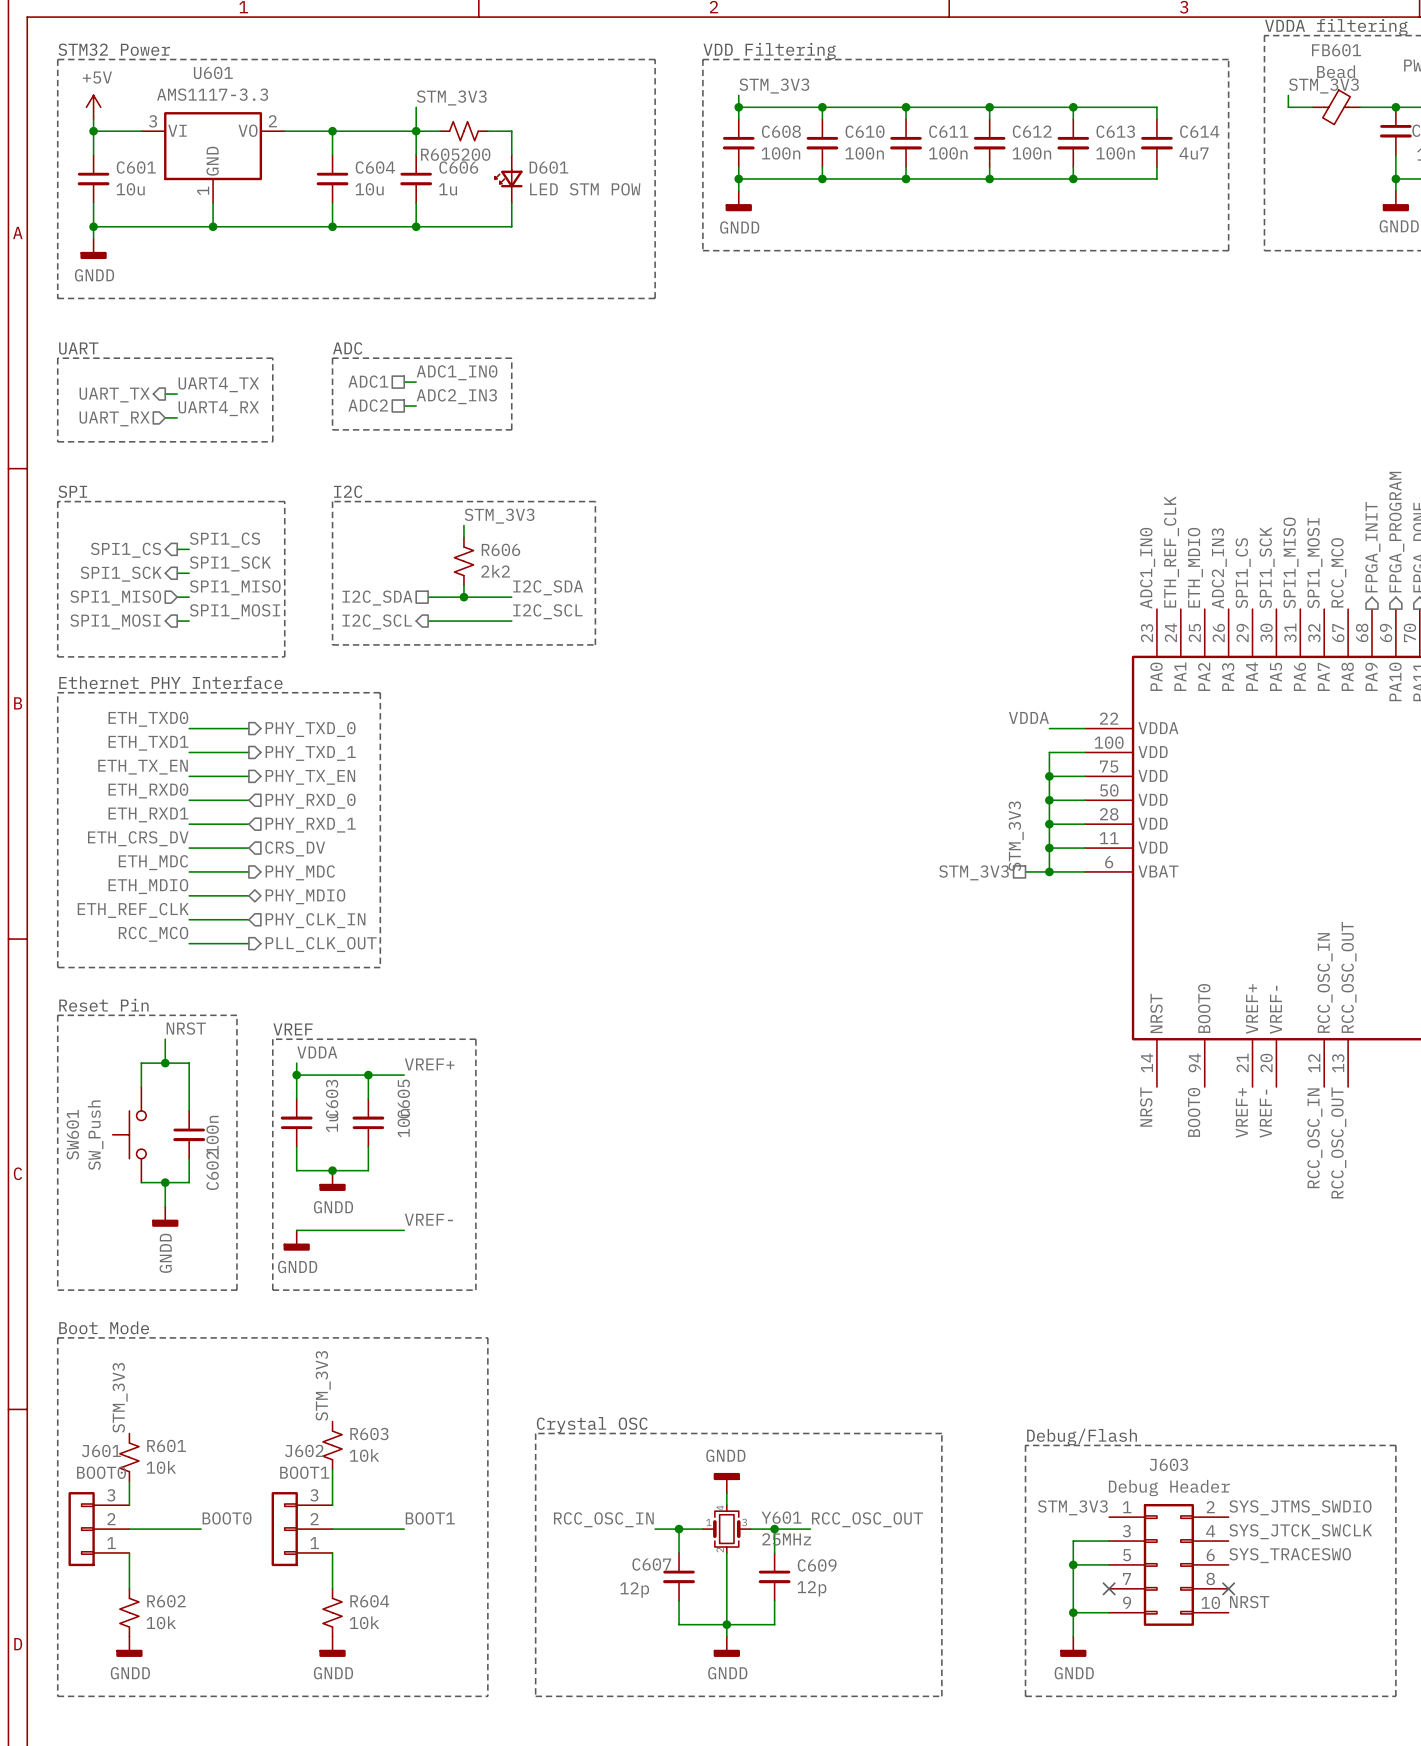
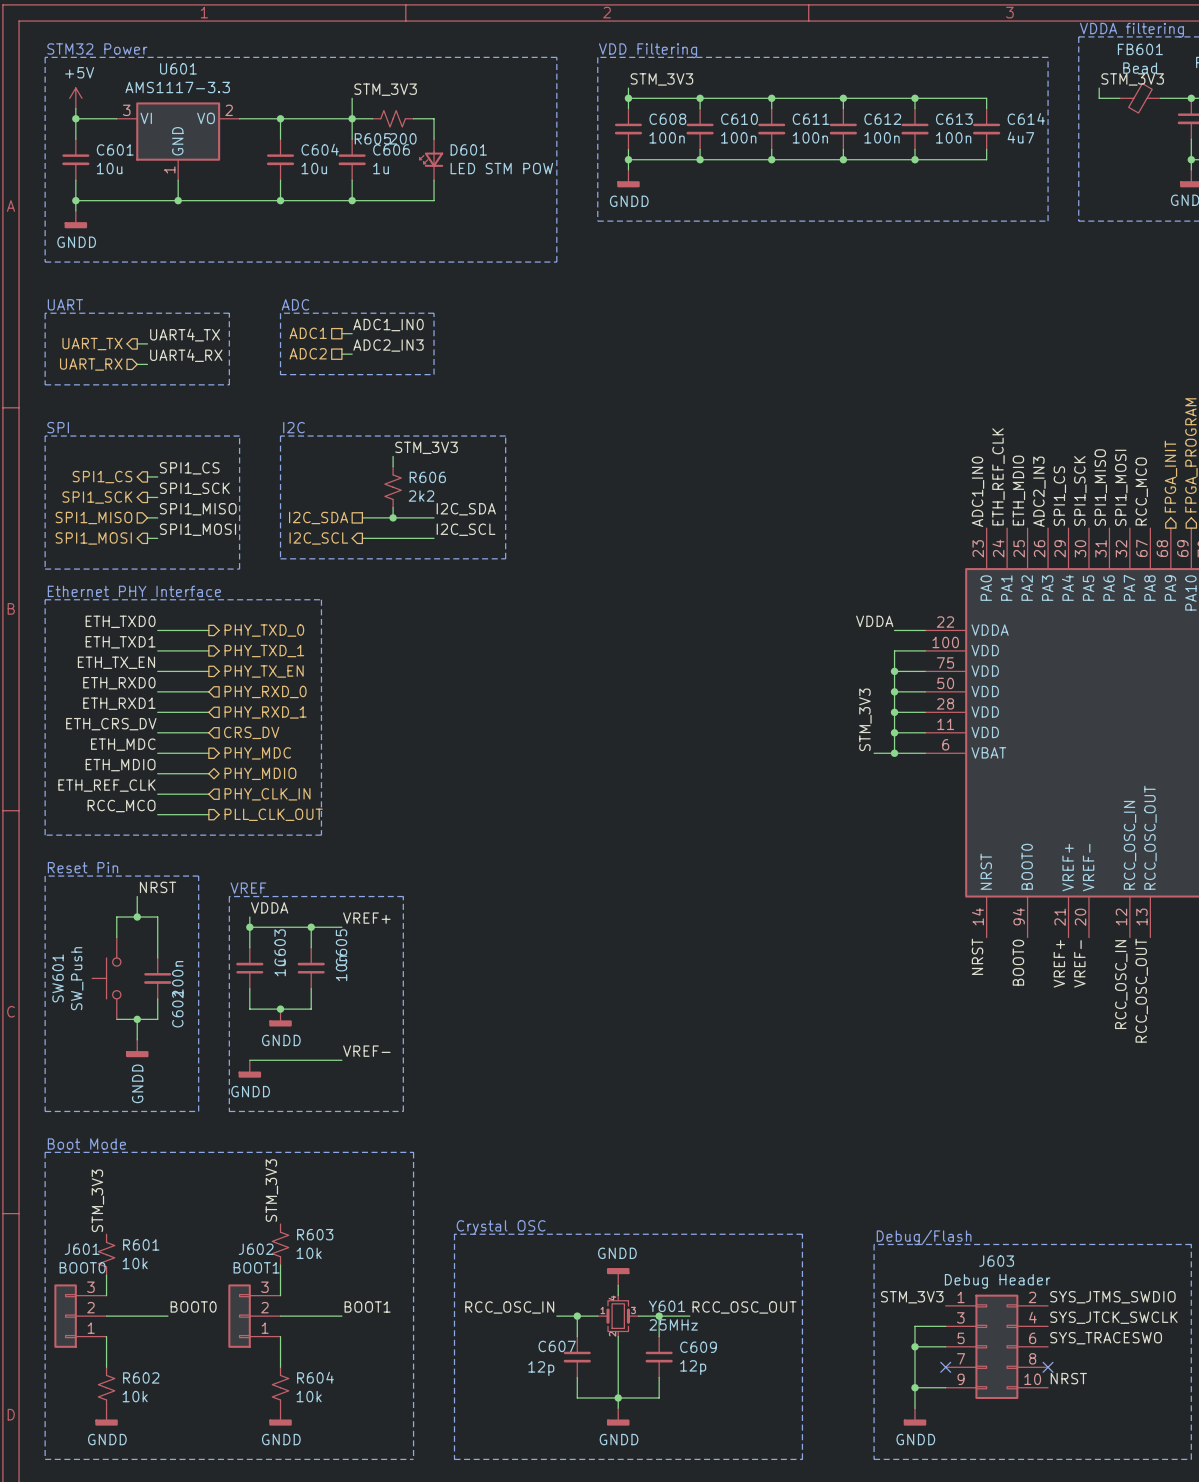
hierarchical label: STM_3V3 (974, 872) -> none

